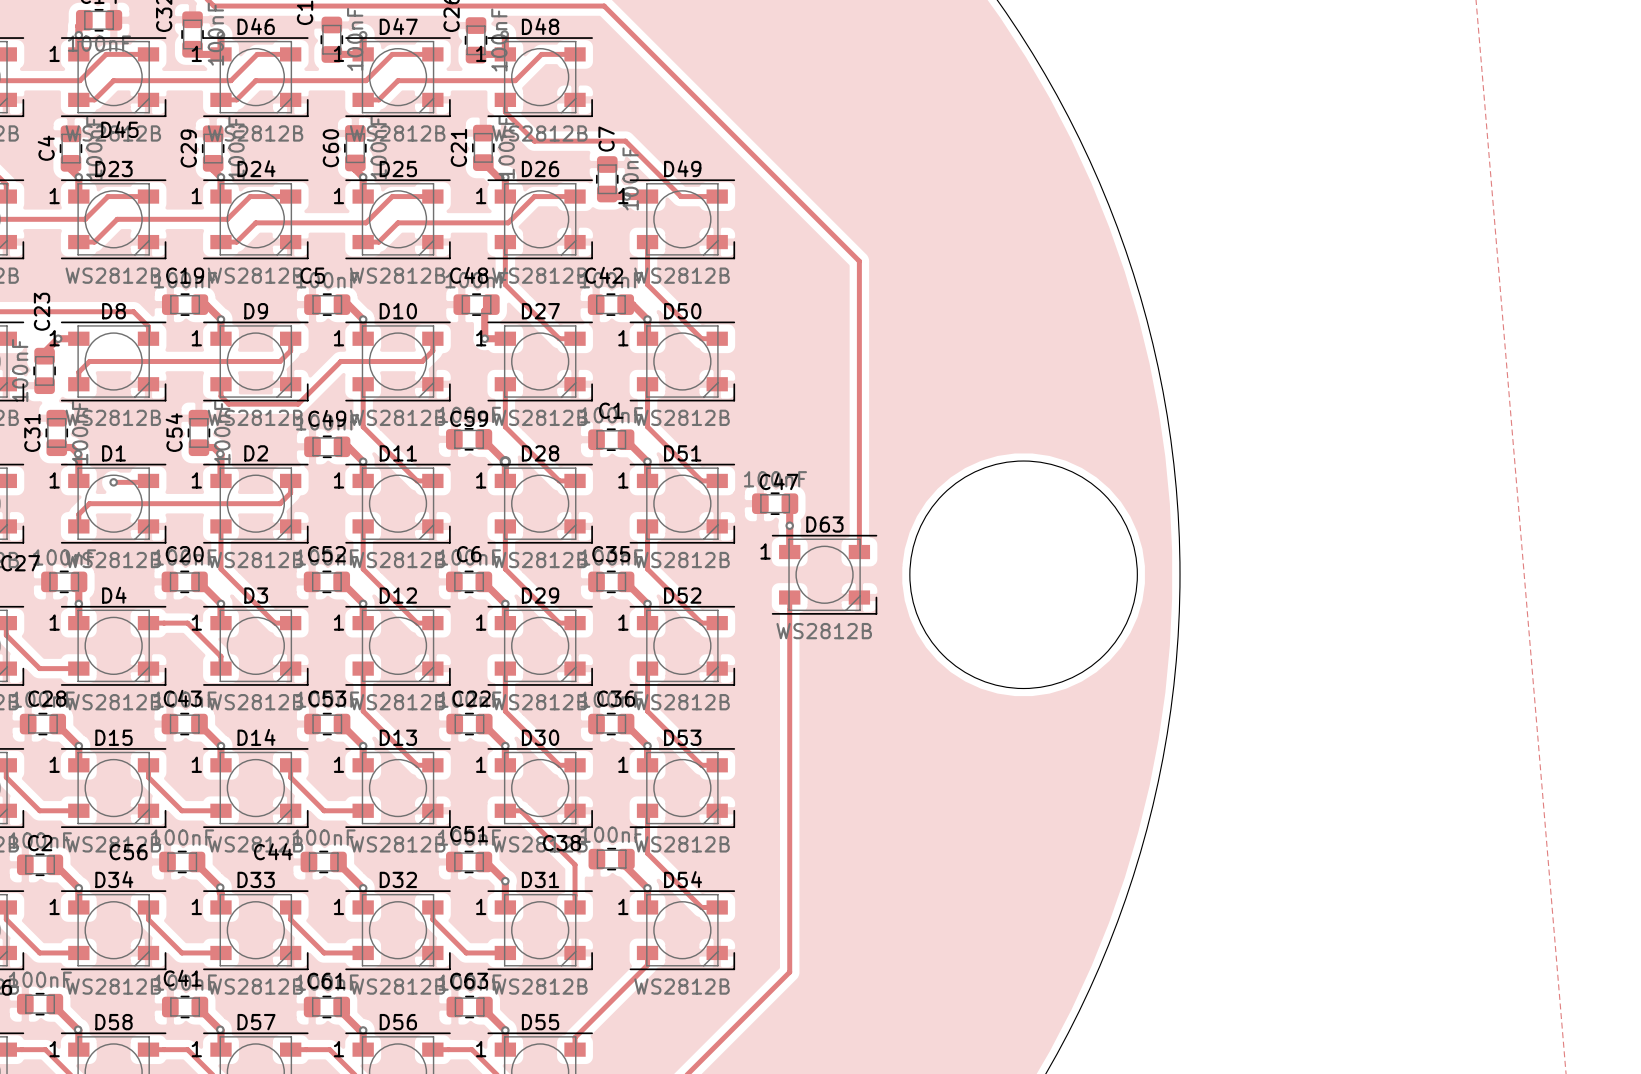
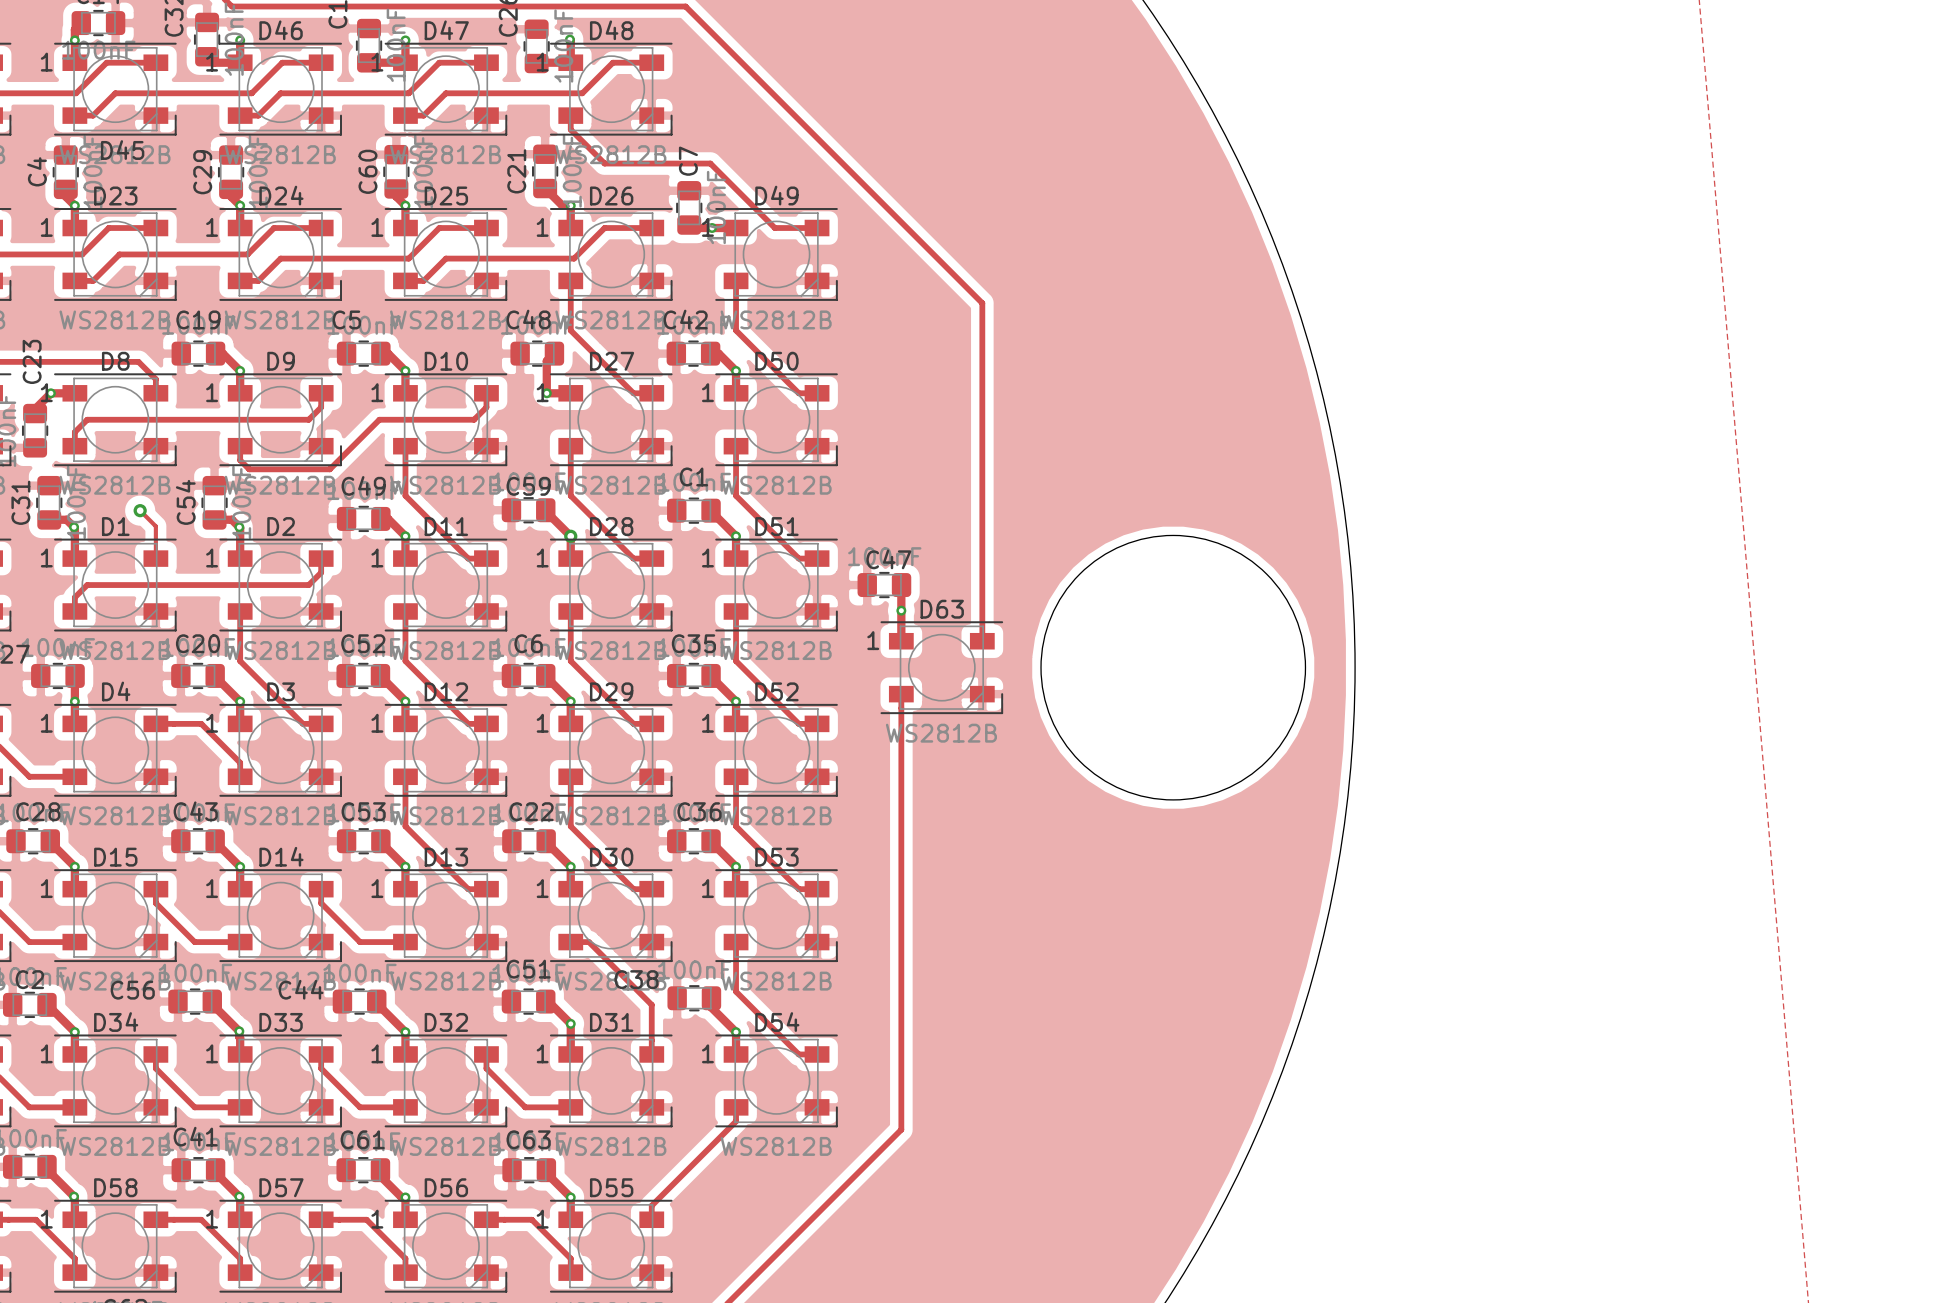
via: none -> (140, 510)
track: (148, 480) (113, 482) -> (155, 558) (155, 526) (140, 510)
via: (113, 482) -> none

